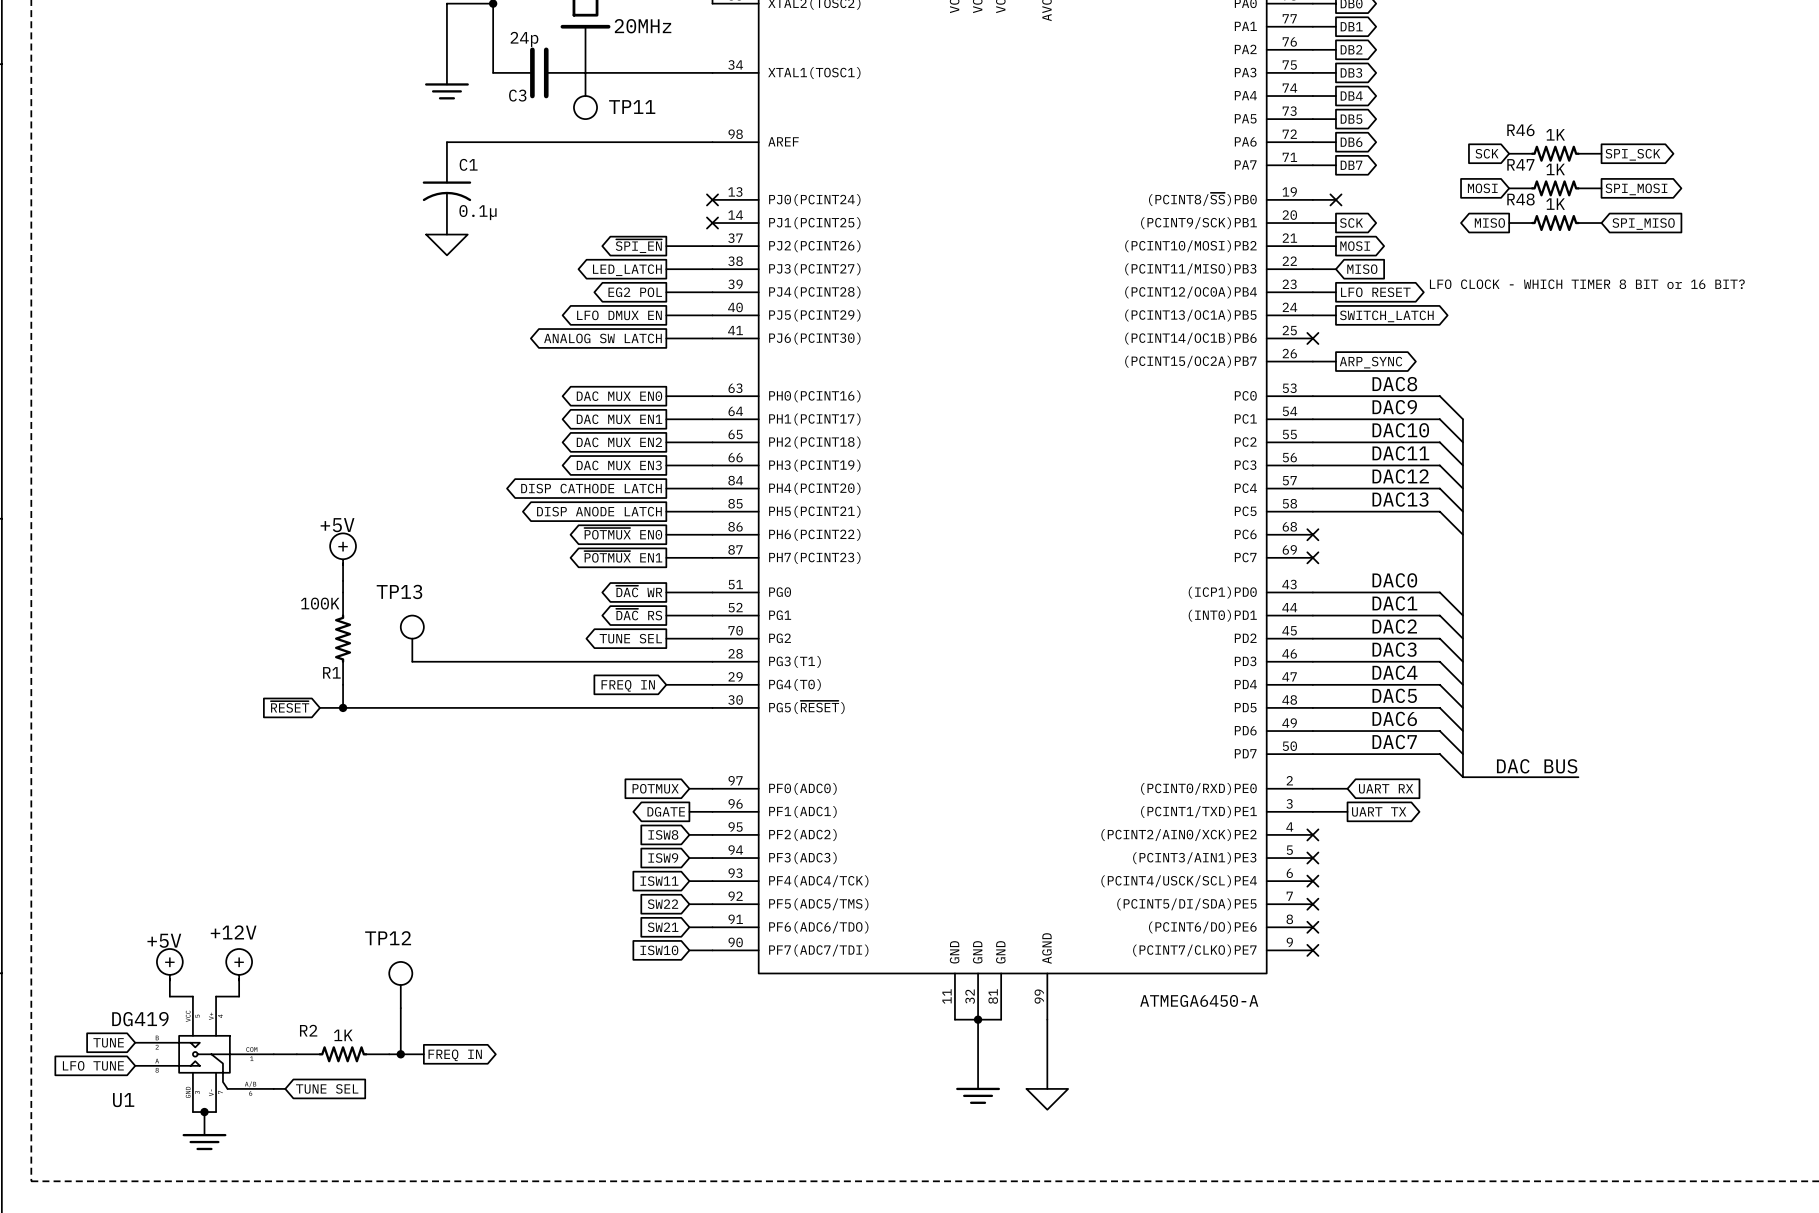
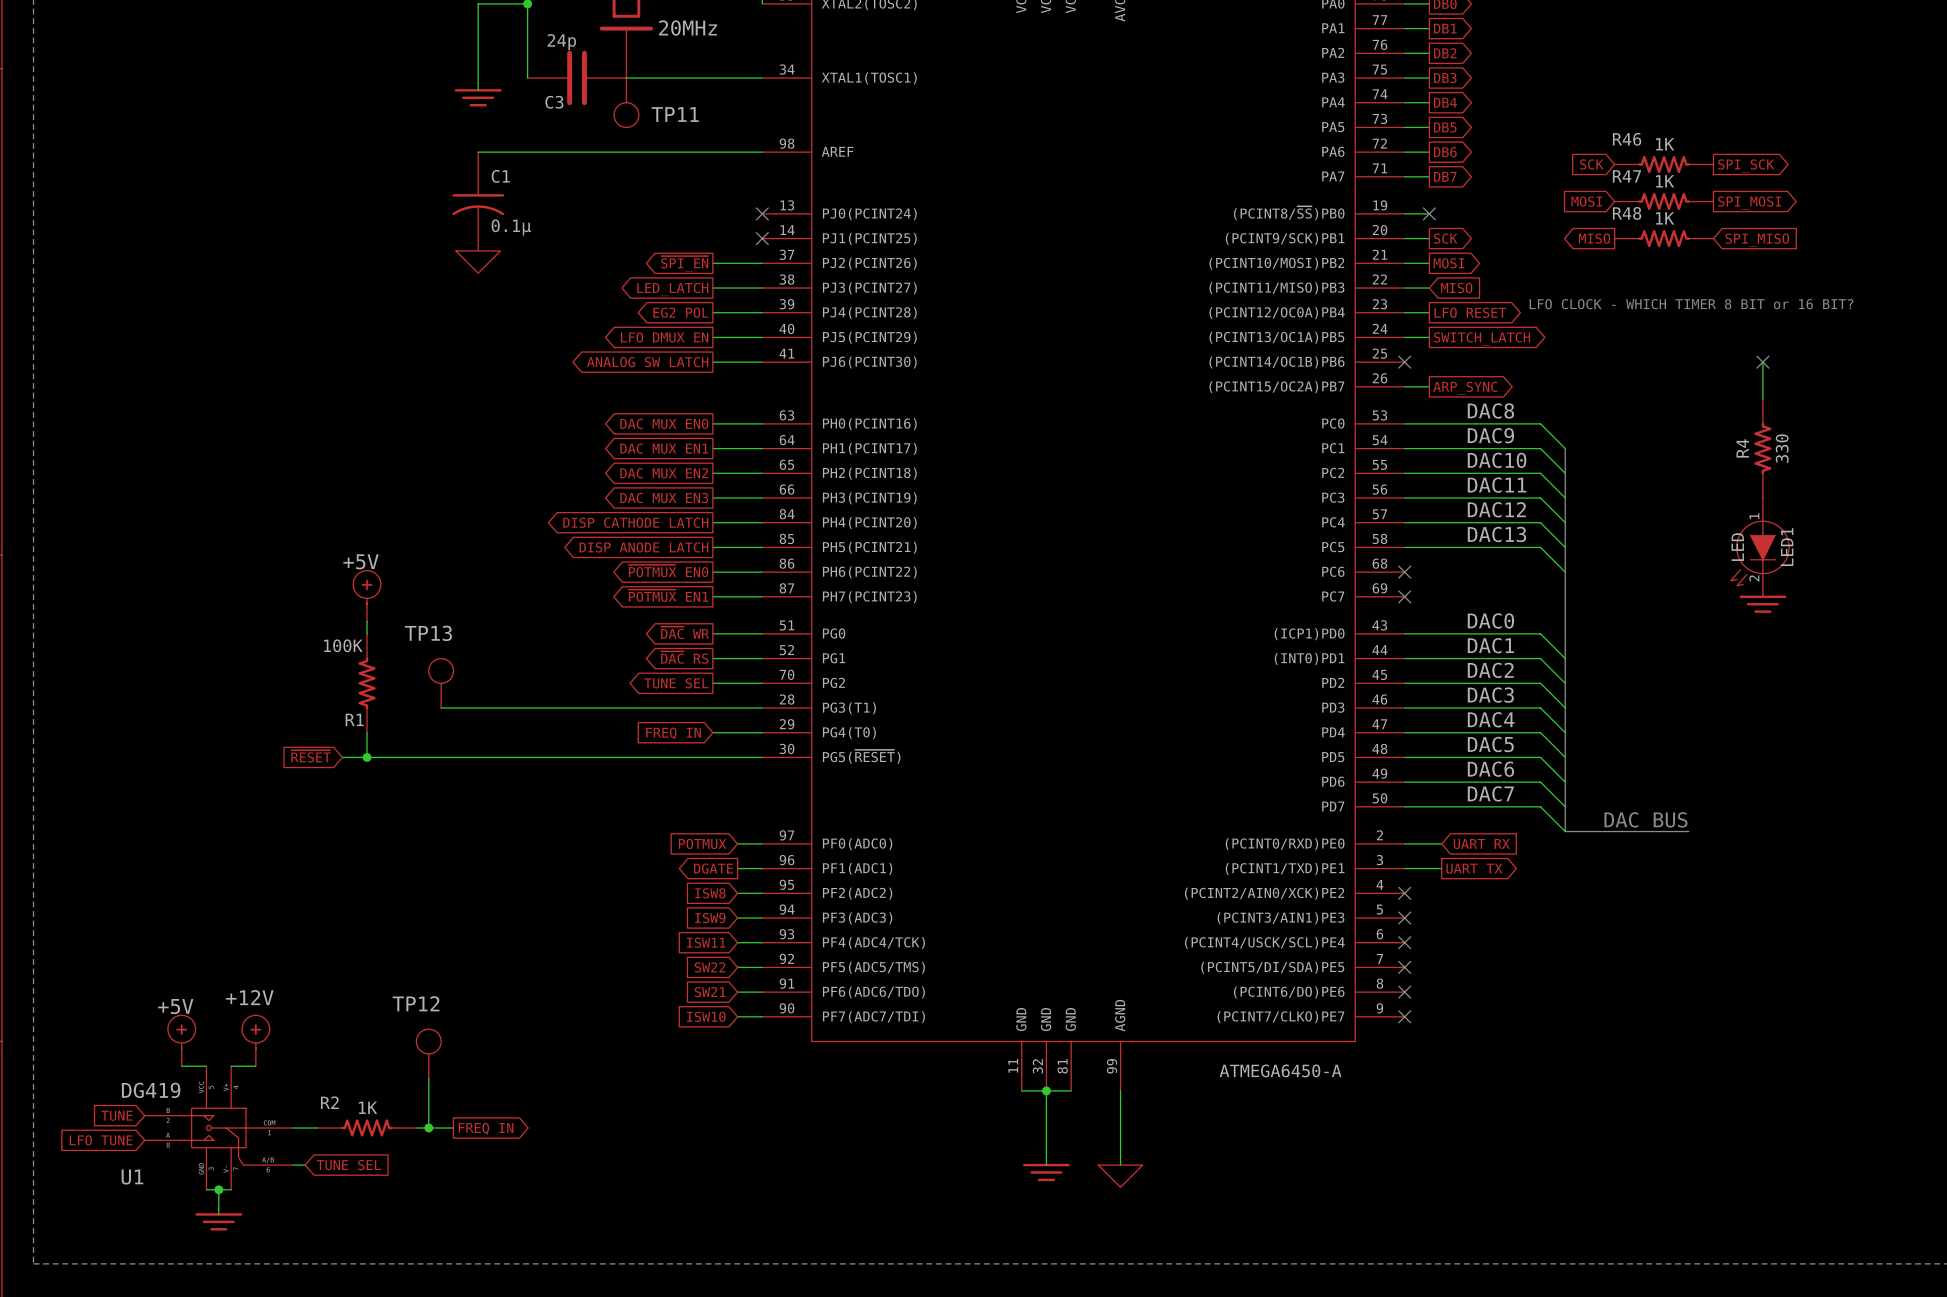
wire: none -> (1762, 362) (1762, 399)
no-connect mark: none -> (1762, 362)
R4: none -> 330 (1762, 448)
LED1: none -> LED (1759, 547)
power symbol: none -> (1762, 604)

